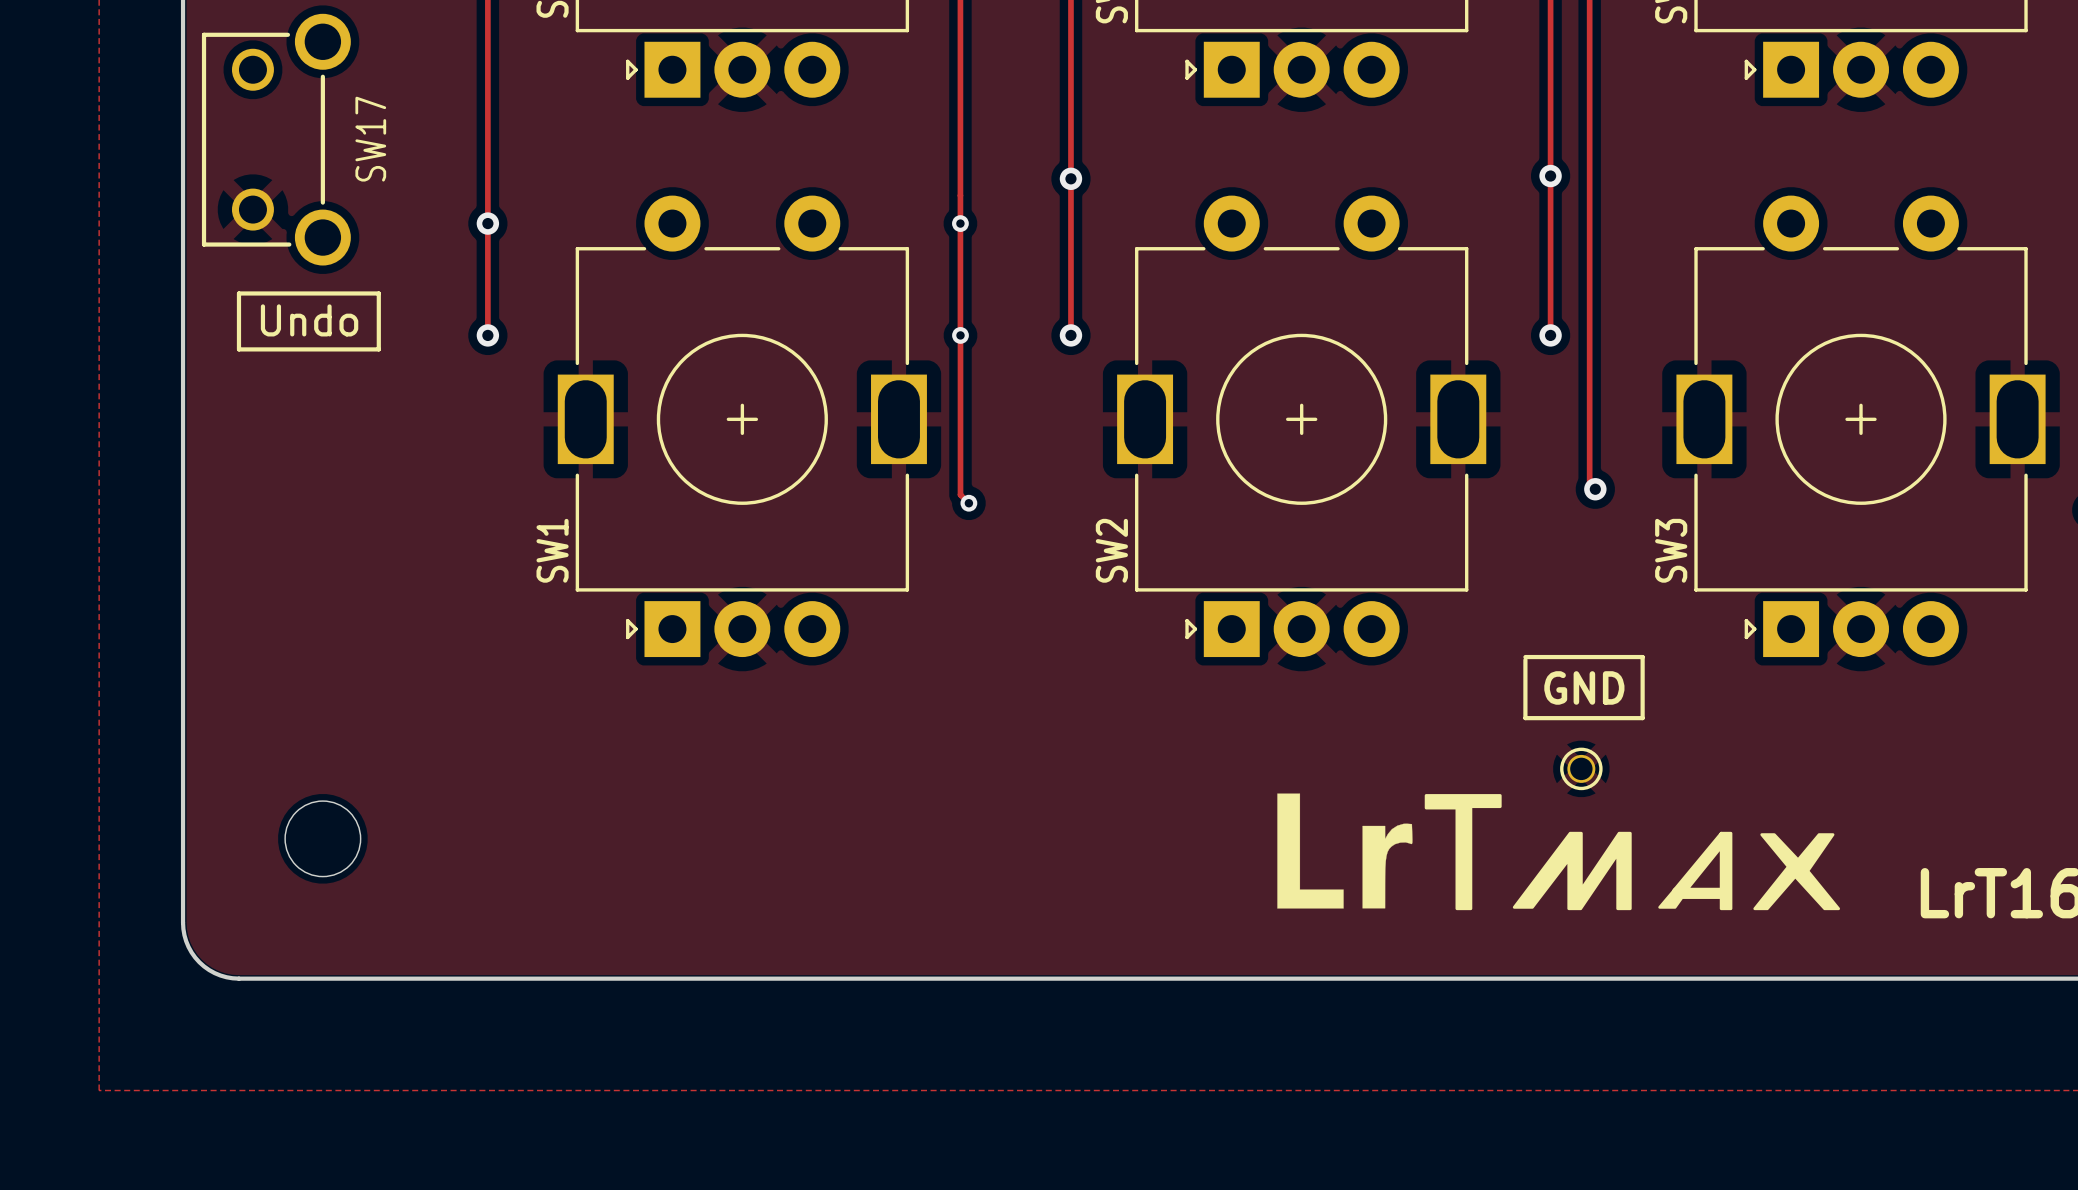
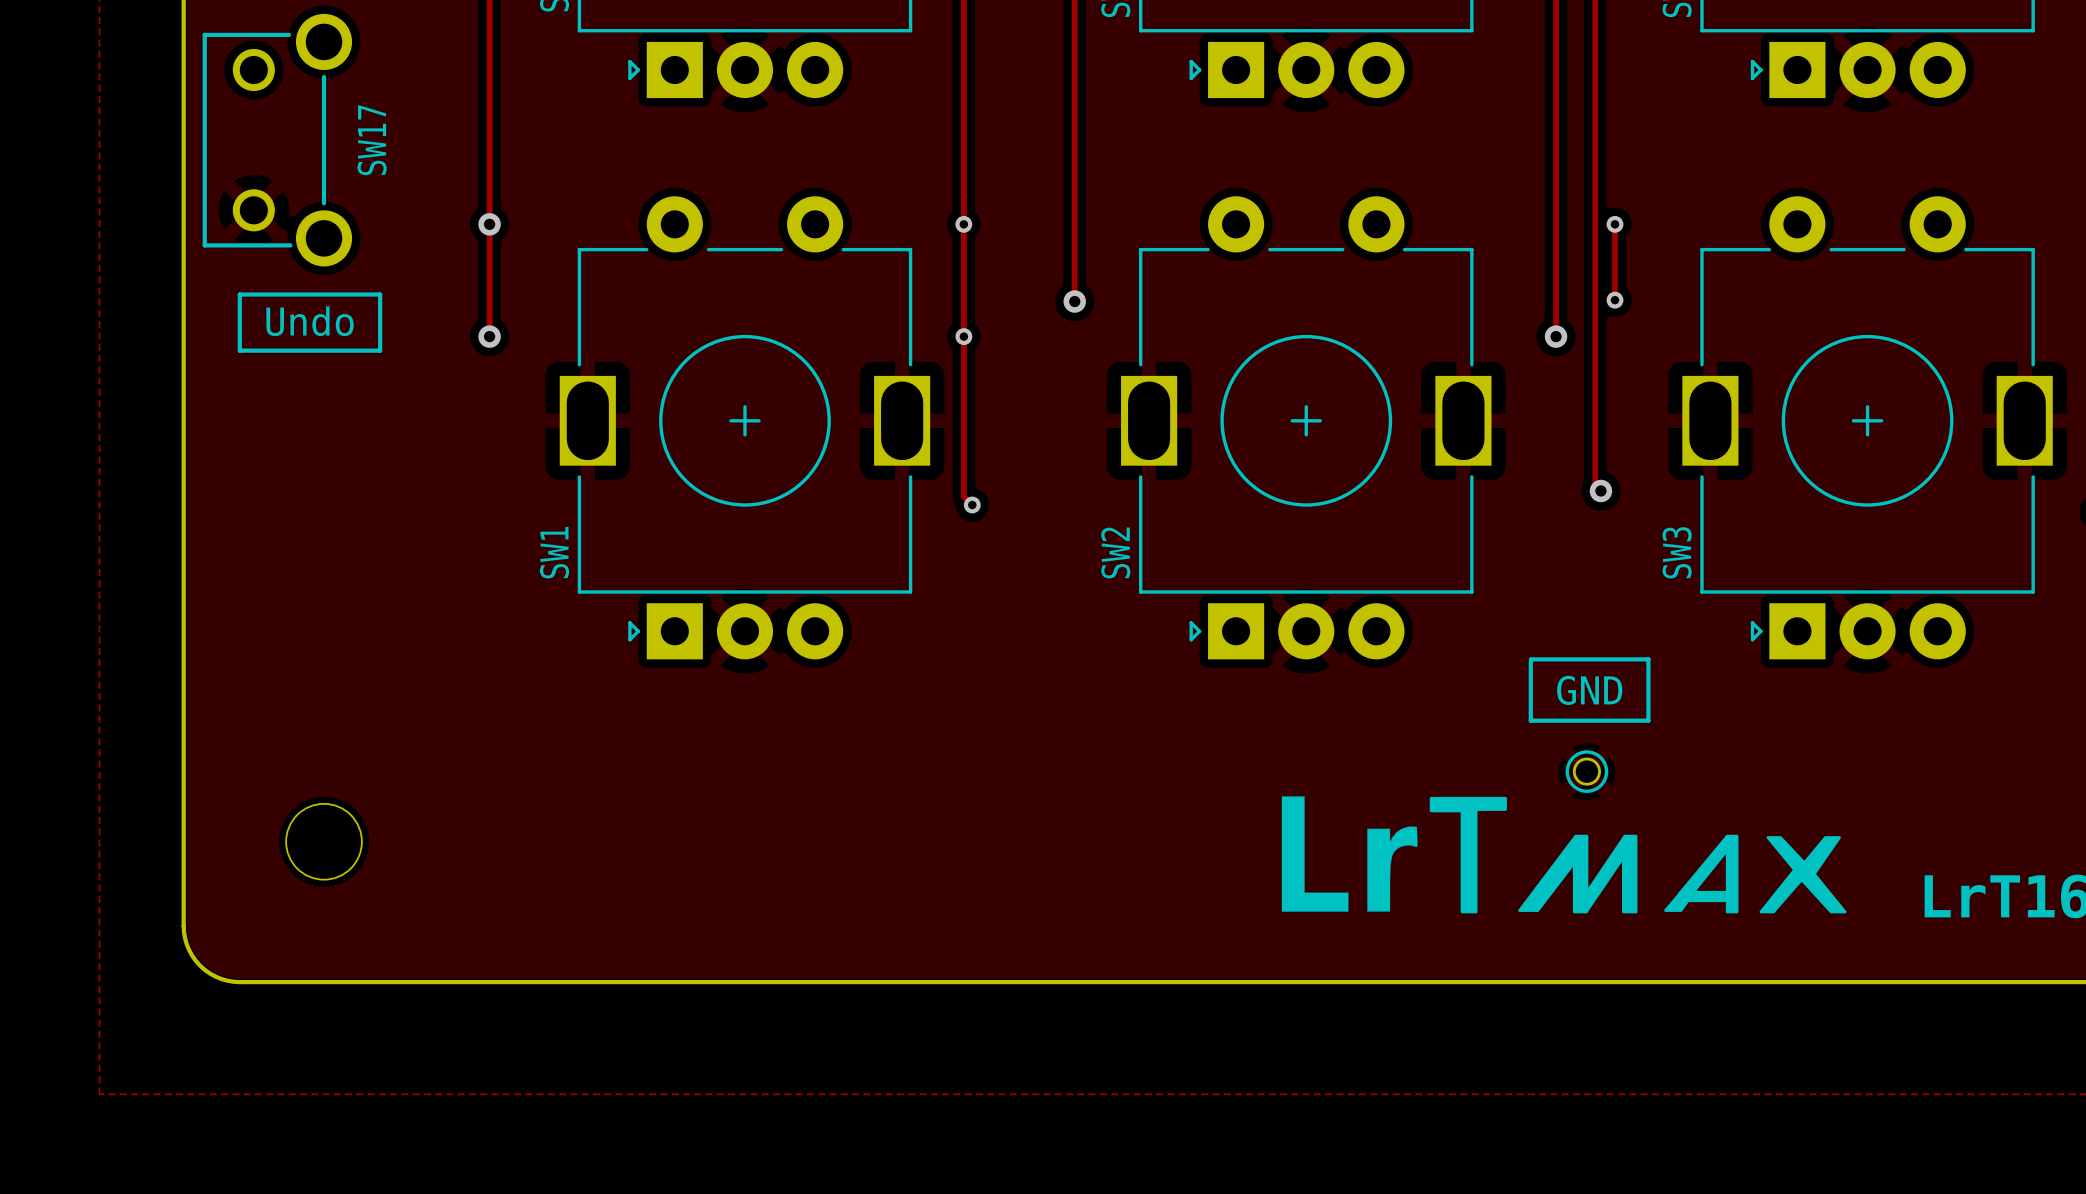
via: (1550, 176) -> none
via: (1070, 178) -> none
track: none -> (1614, 224) (1614, 300)
via: none -> (1614, 224)
via: none -> (1614, 300)
track: (1070, 300) (1070, 335) -> none
via position: (1070, 335) -> (1074, 301)

